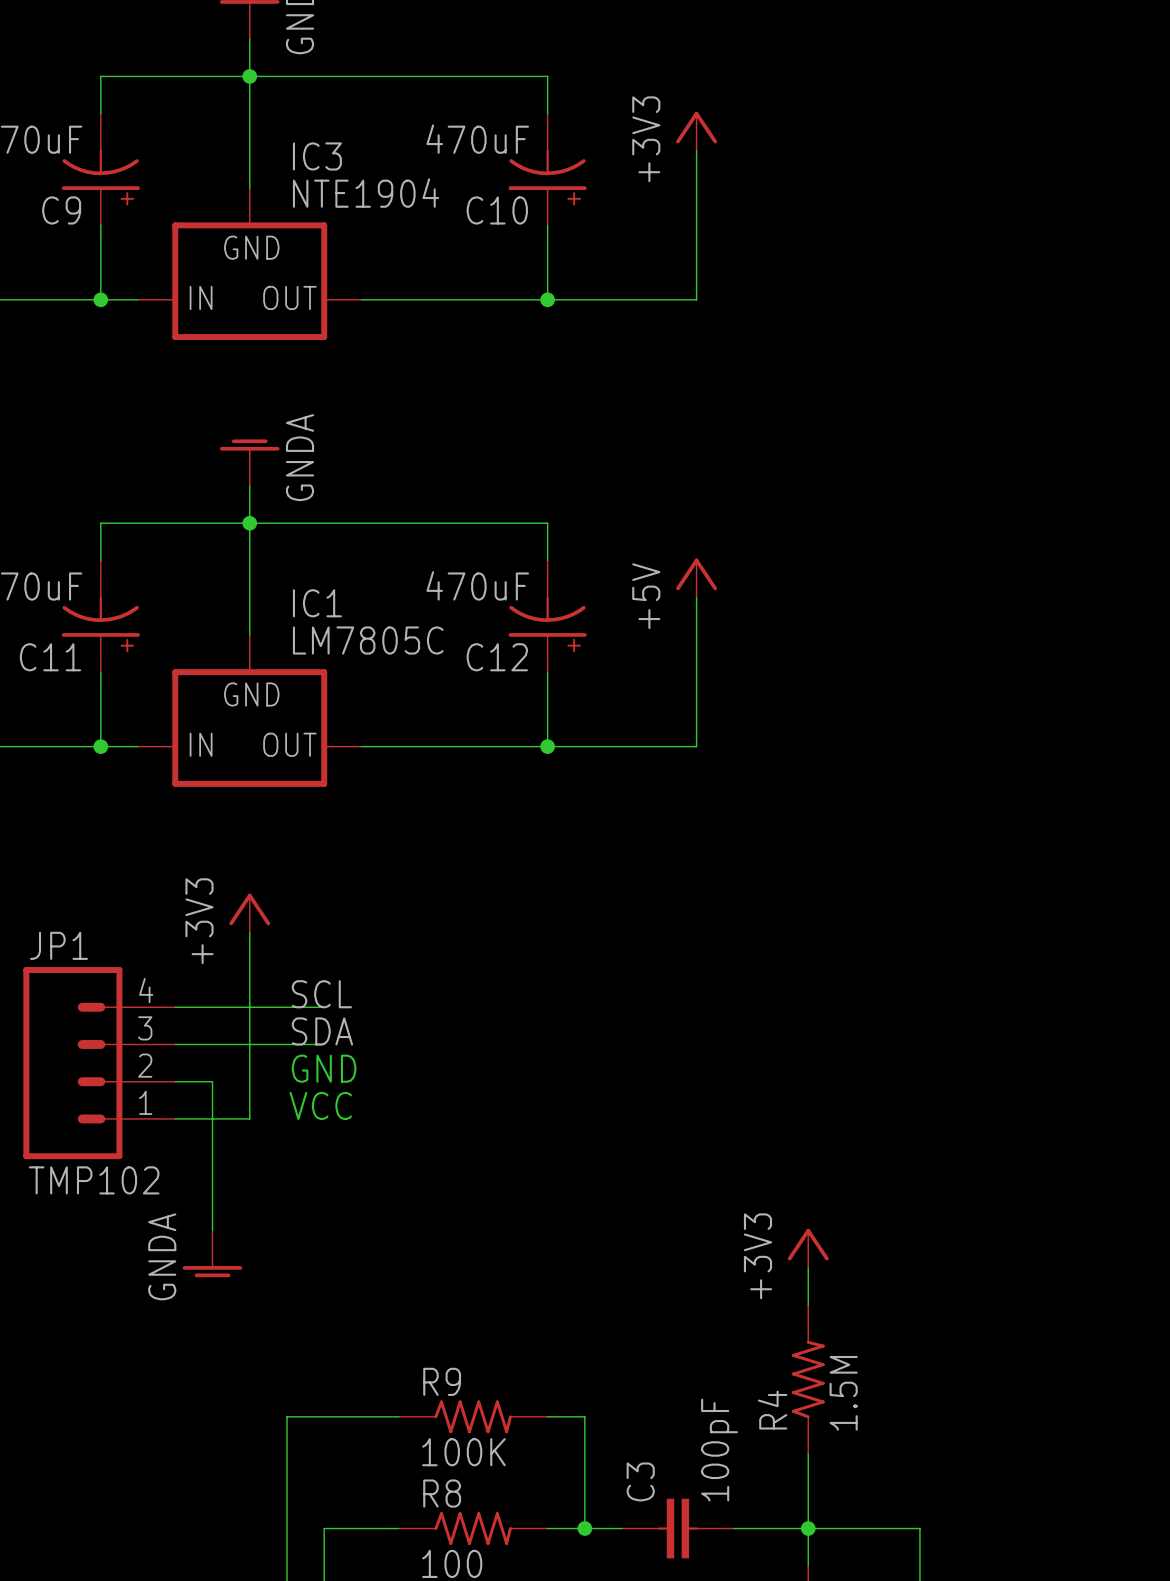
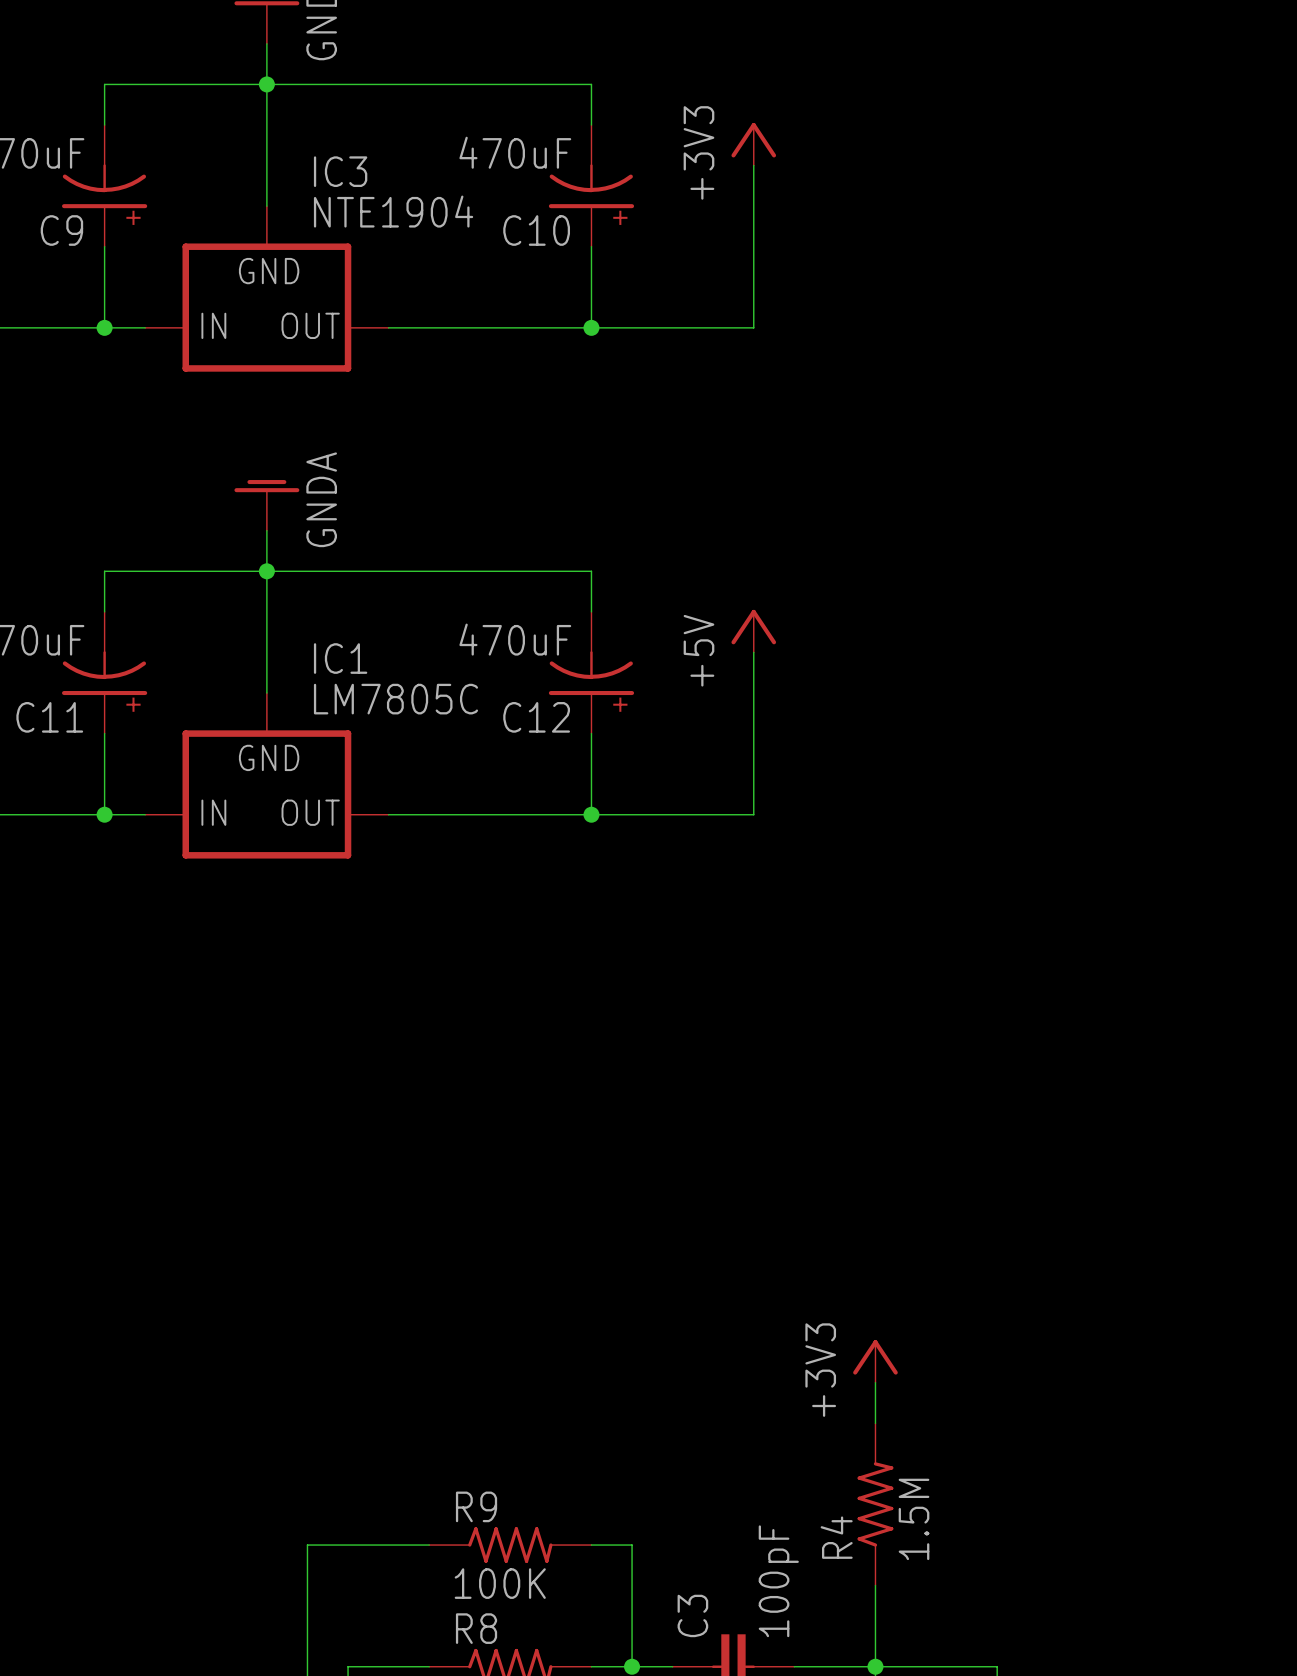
power symbol: +3V3 (249, 913) -> none
wire: (249, 932) (249, 1118) (175, 1118) -> none
label: SCL (321, 994) -> none
wire: (175, 1007) (324, 1007) -> none
label: SDA (322, 1031) -> none
wire: (175, 1044) (324, 1044) -> none
JP1: TMP102 (99, 1063) -> none
text: GND (324, 1068) -> none
wire: (175, 1081) (212, 1081) (212, 1230) -> none
text: VCC (320, 1105) -> none
power symbol: GNDA (212, 1253) -> none

